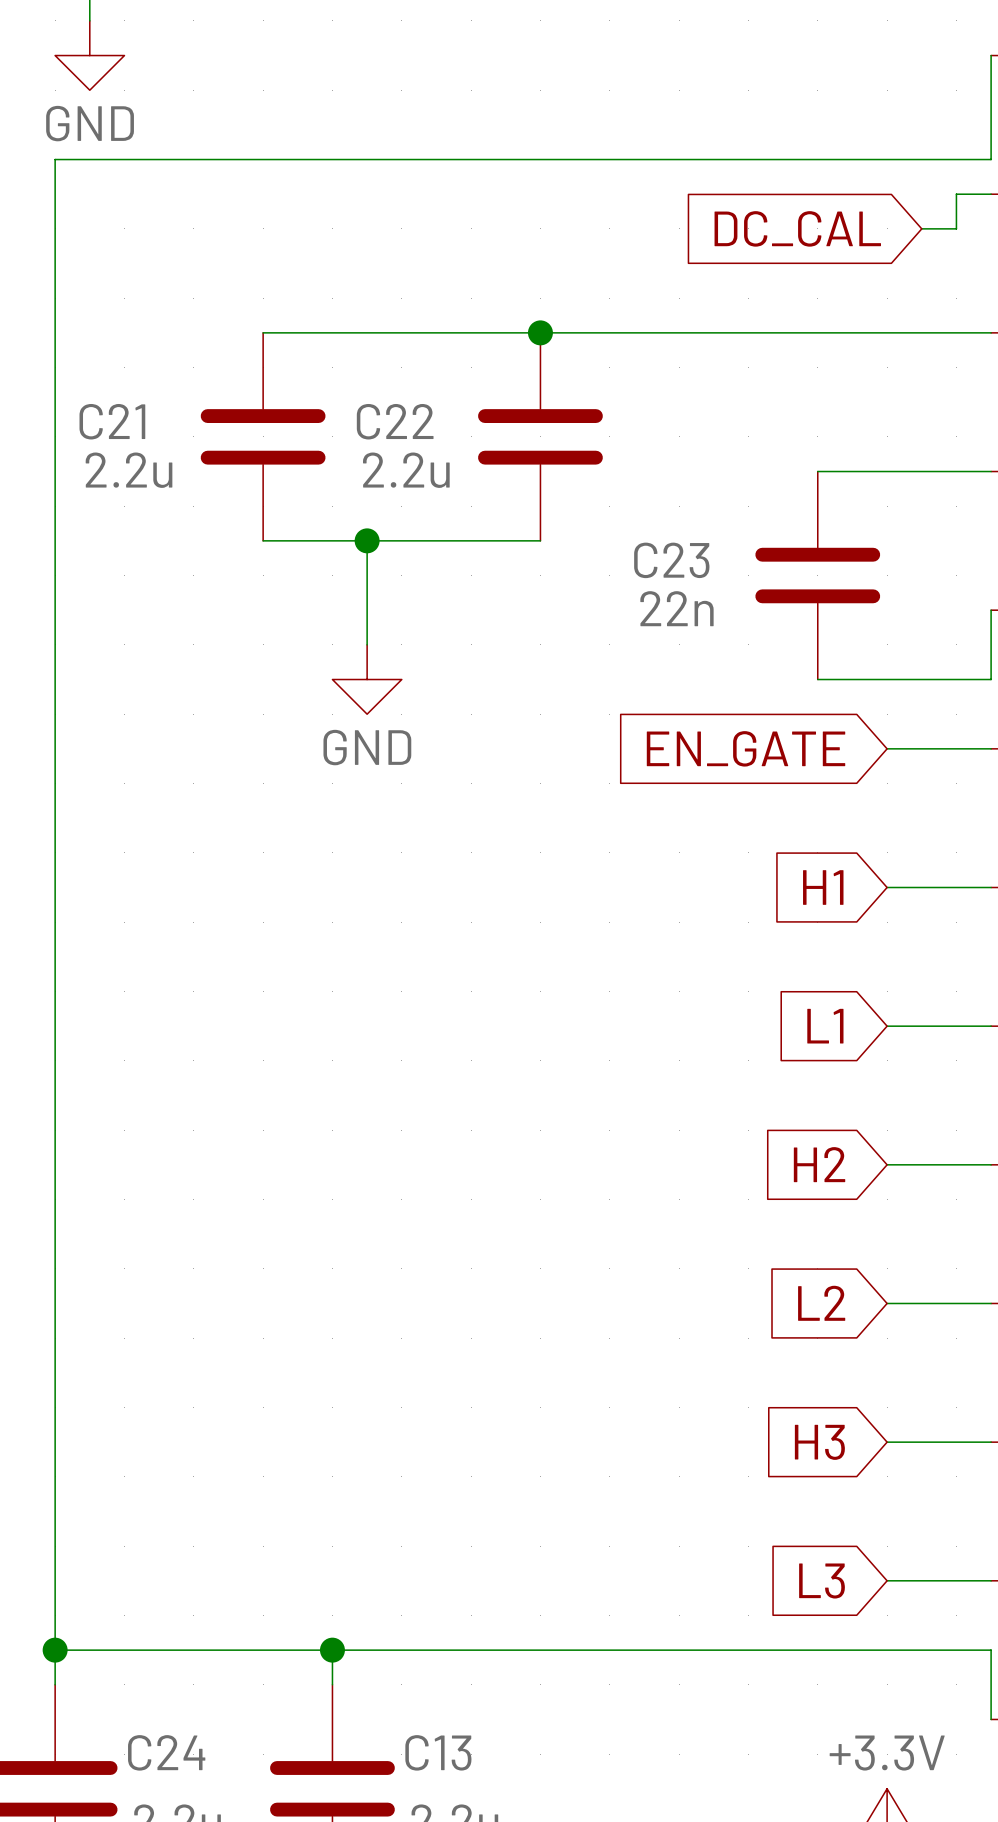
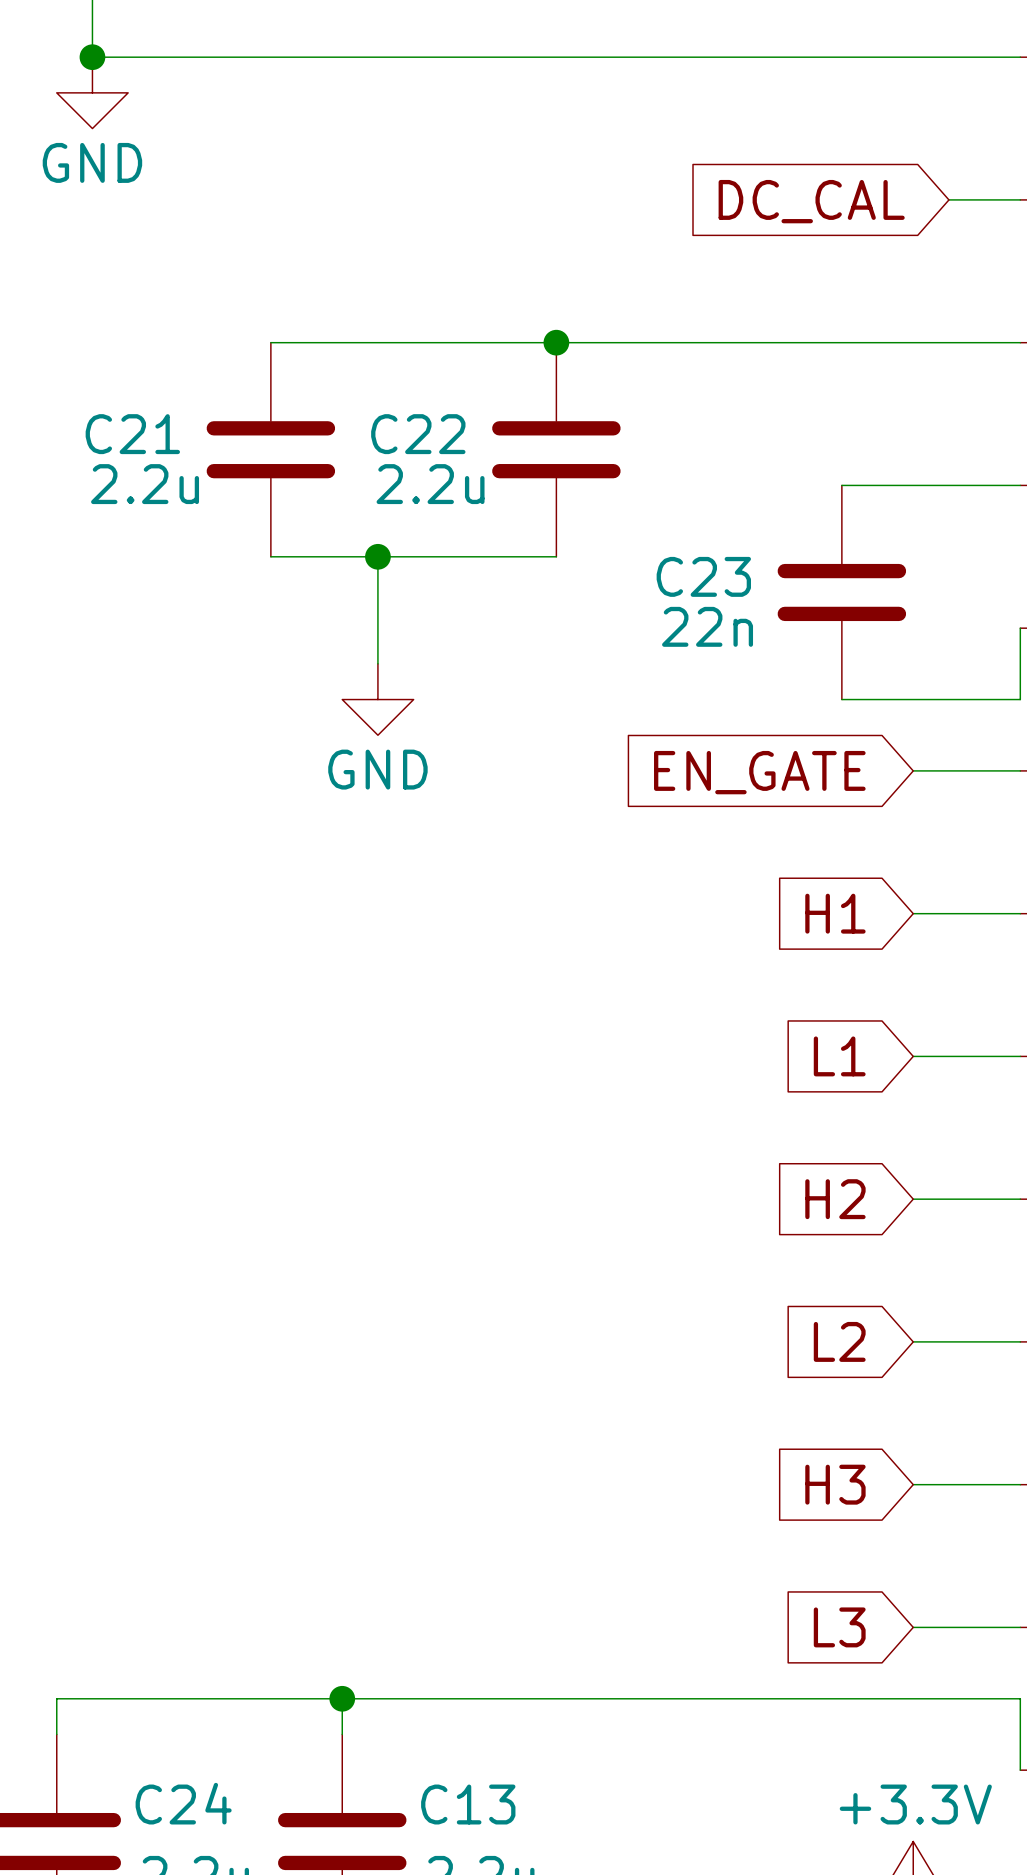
junction: none -> (92, 57)
power symbol position: GND (89, 55) -> GND (92, 92)
wire: (991, 55) (991, 159) (55, 159) (55, 1650) -> (1020, 57) (92, 57) (92, 21)
wire: (956, 194) (956, 228) (921, 228) -> (984, 199) (948, 199)
global label position: DC_CAL (797, 228) -> DC_CAL (811, 201)
junction: (55, 1650) -> none

